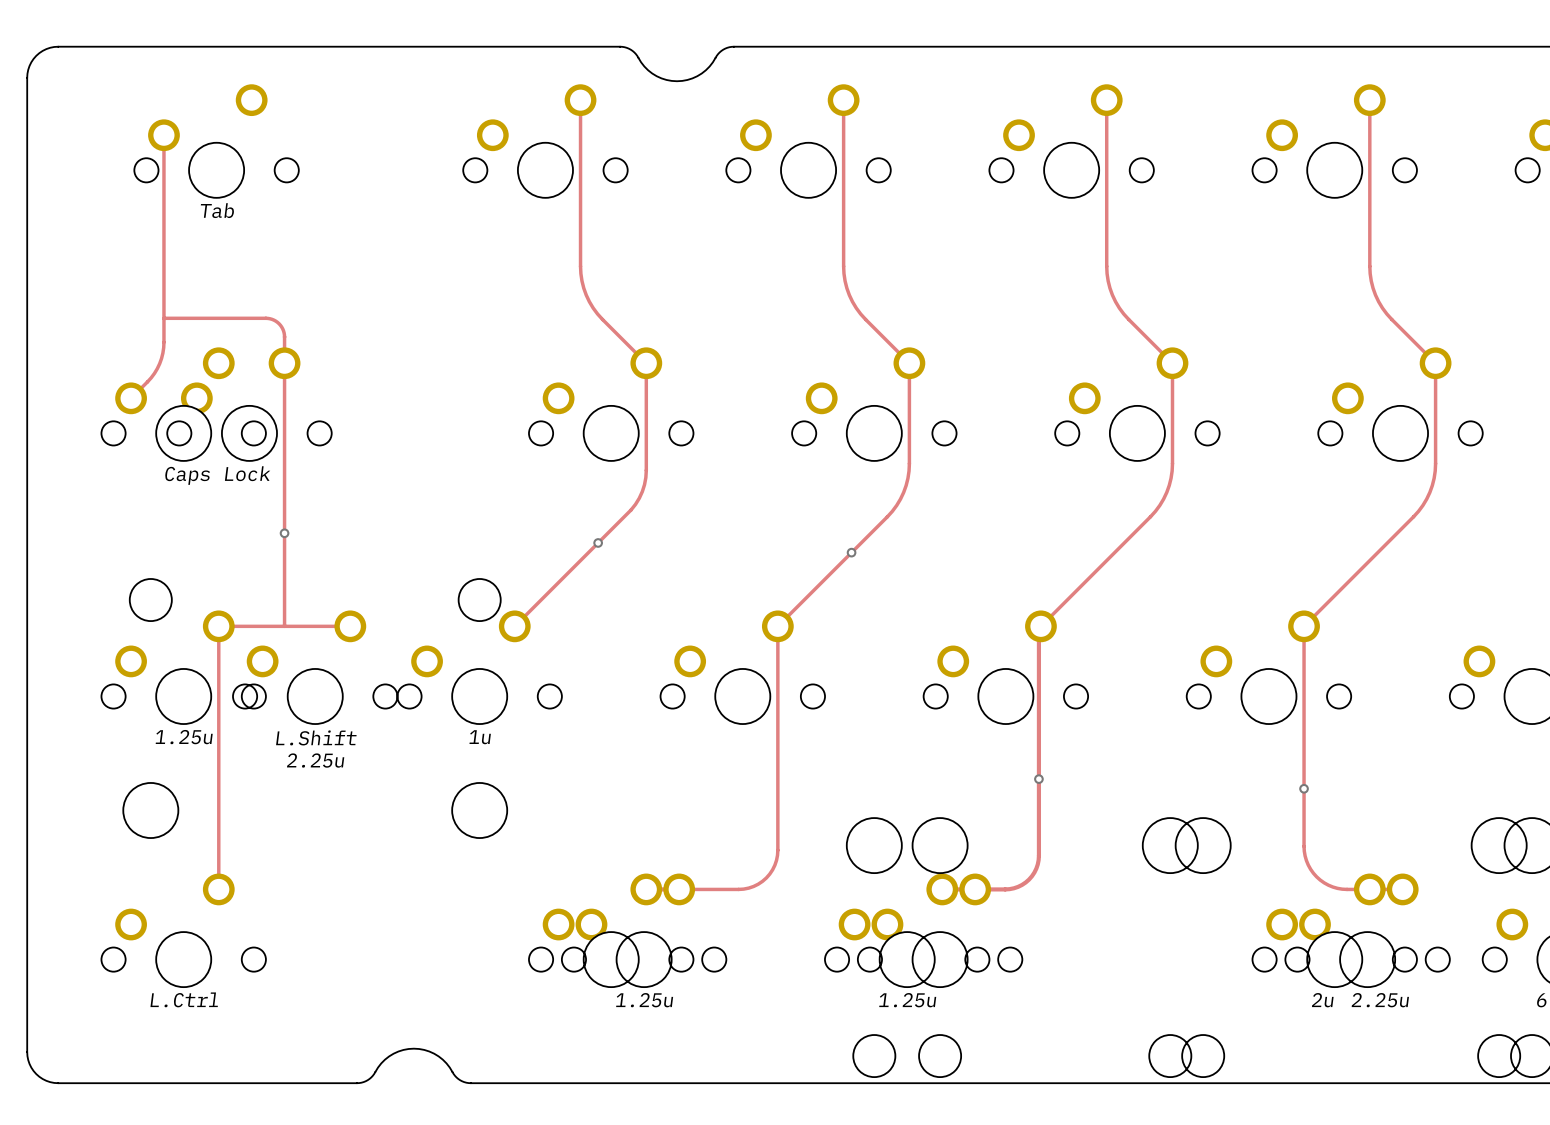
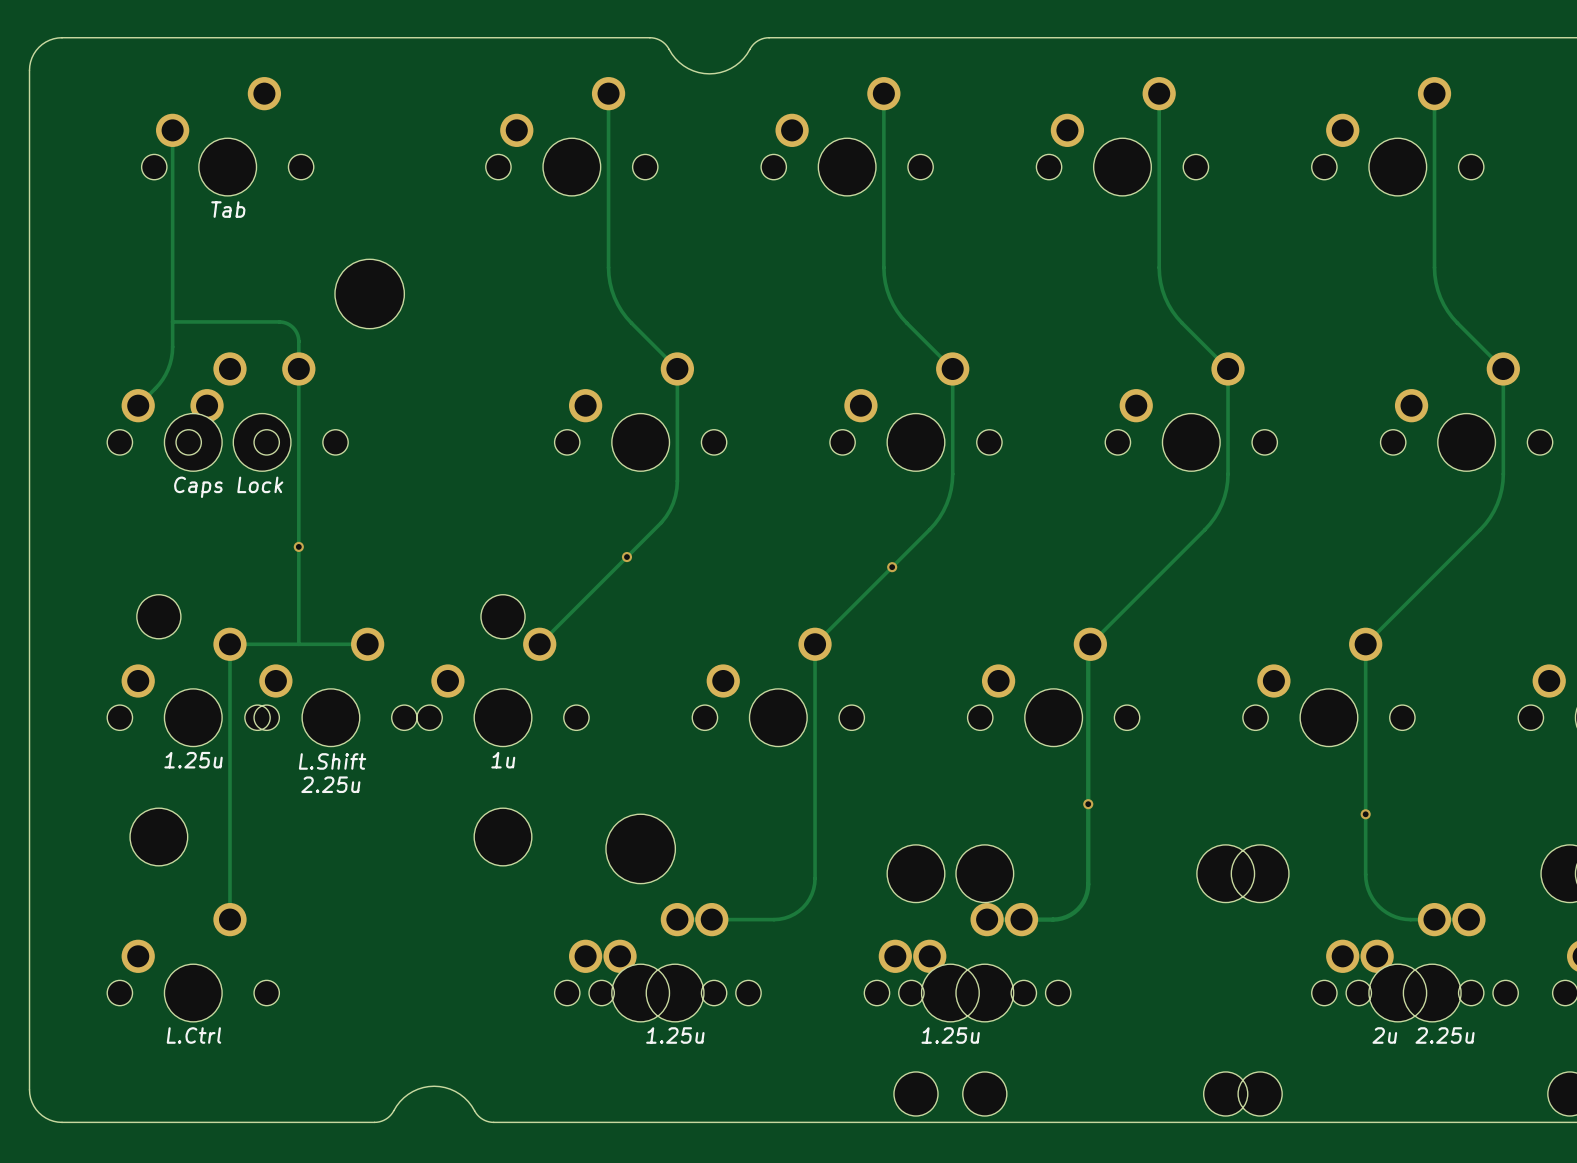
part: none -> (369, 293)
part: none -> (640, 848)

